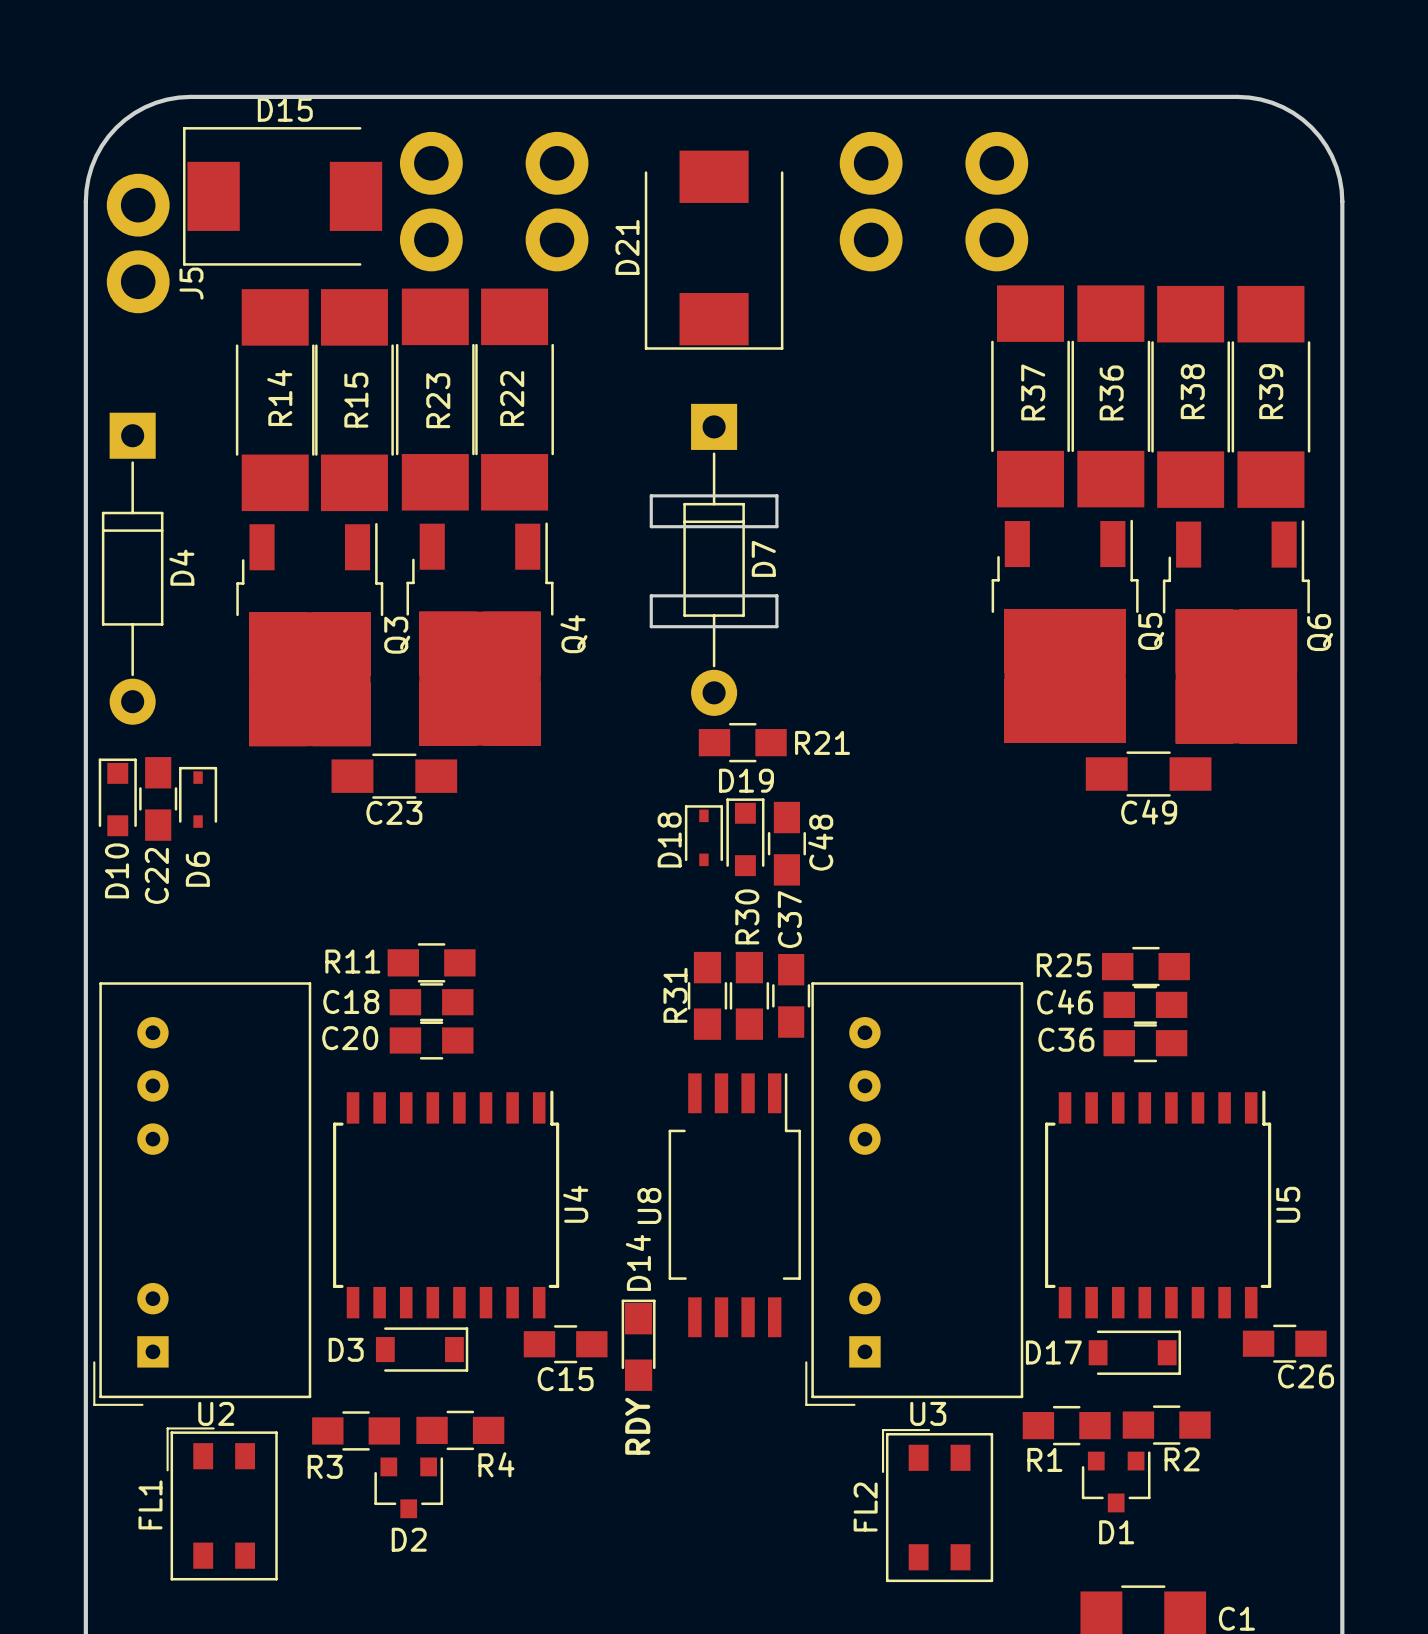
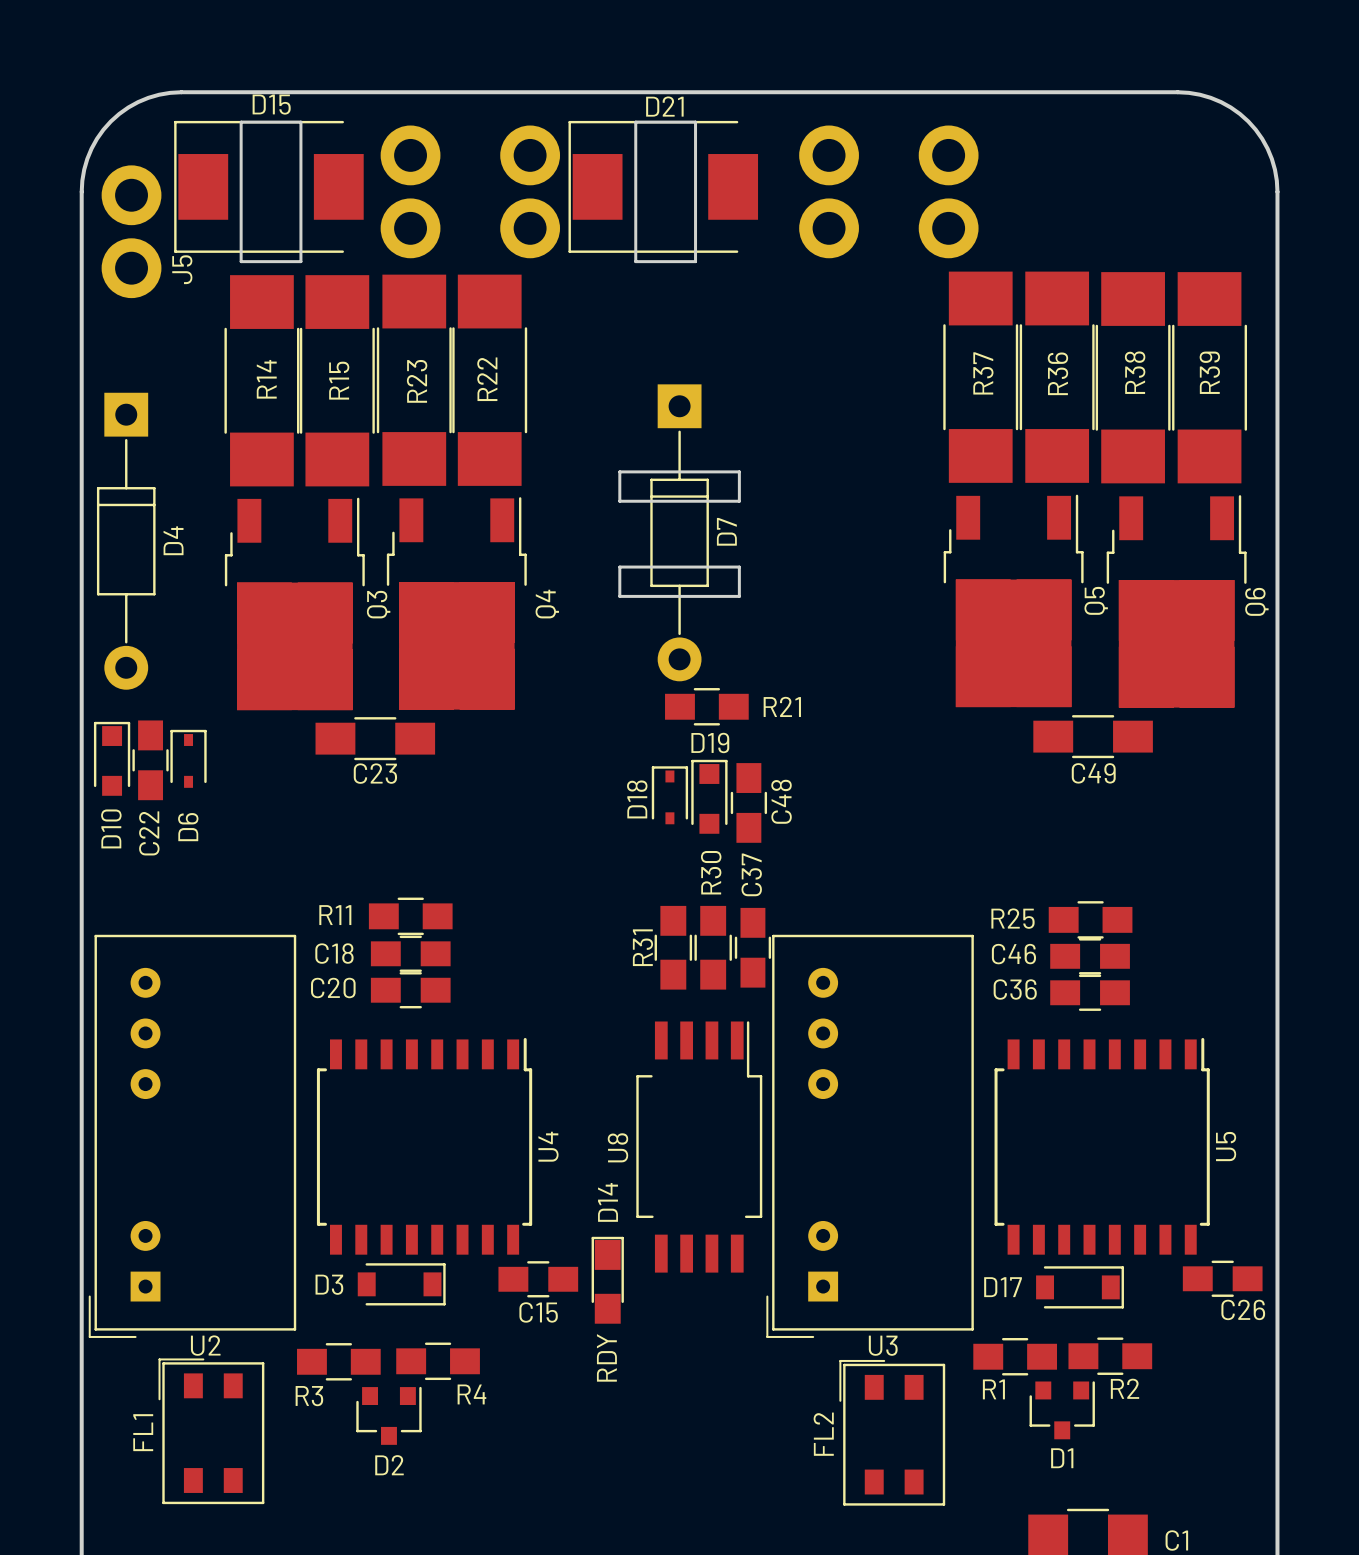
board edge: none -> (241, 122) (300, 122) (300, 261) (241, 261) (241, 122)
board edge: none -> (635, 122) (695, 122) (695, 261) (635, 261) (635, 122)
D21 rotation: 0° (714, 250) -> 90° clockwise (663, 186)

